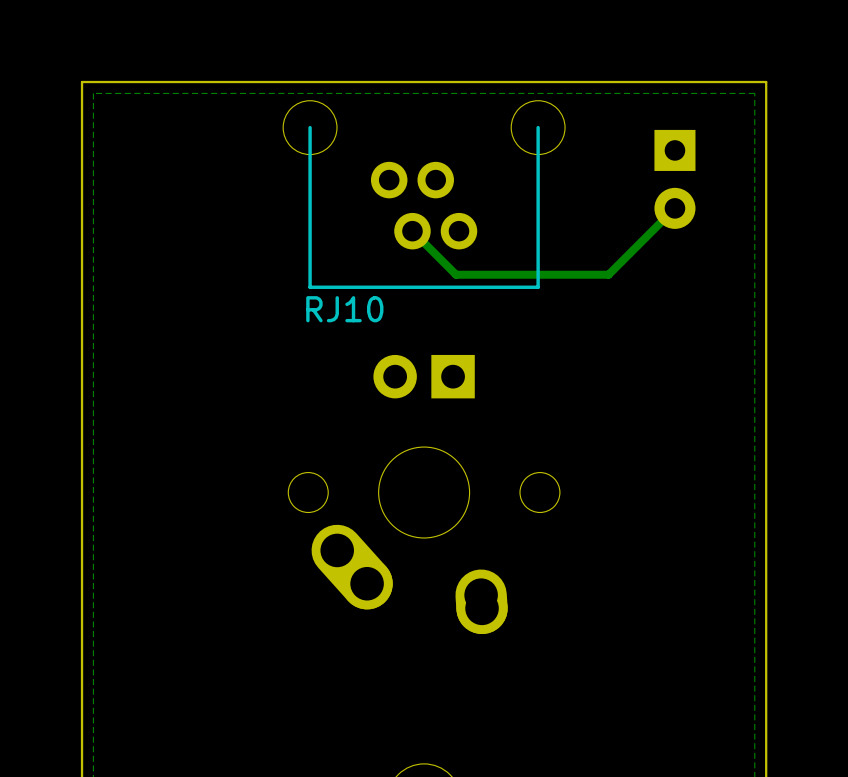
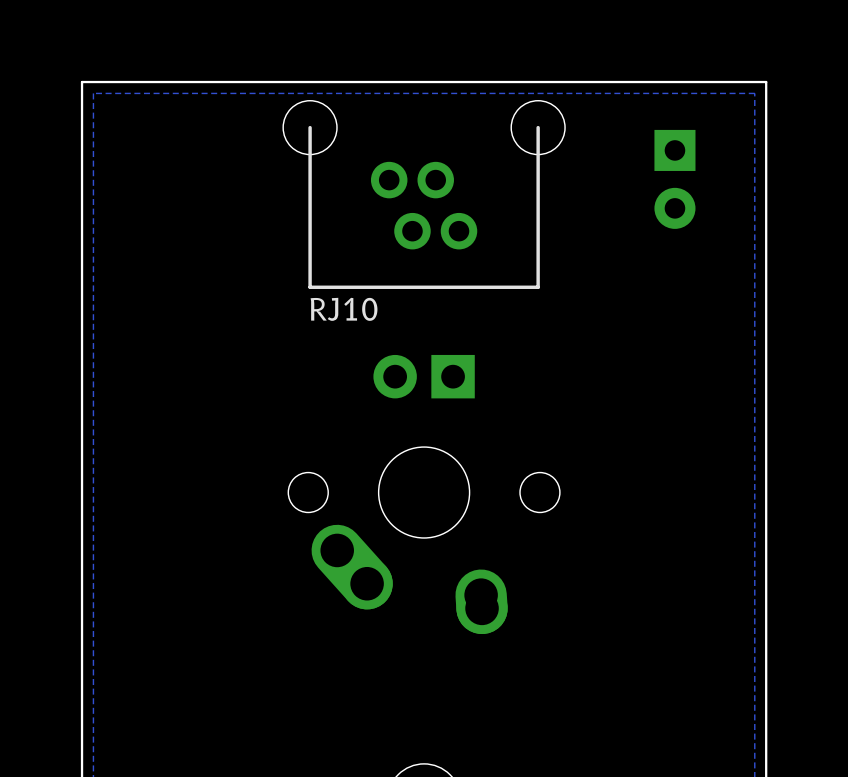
track: (674, 208) (608, 274) (456, 274) (412, 231) -> none

